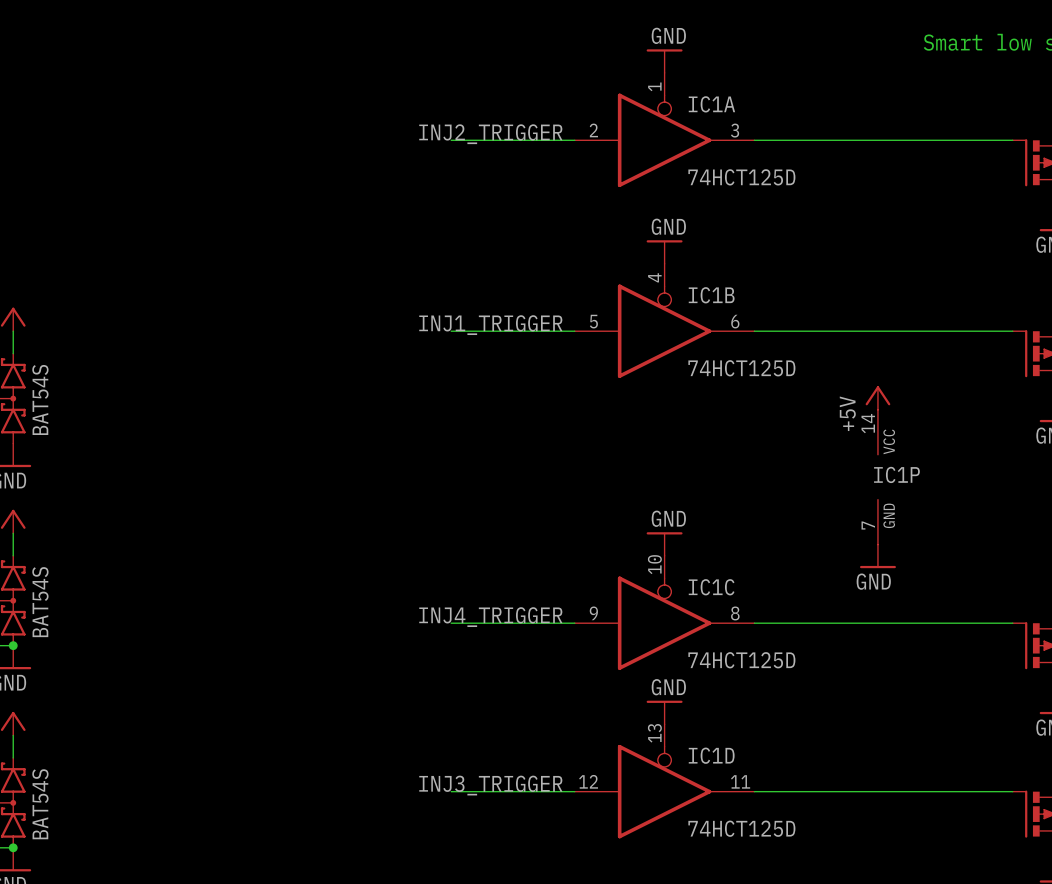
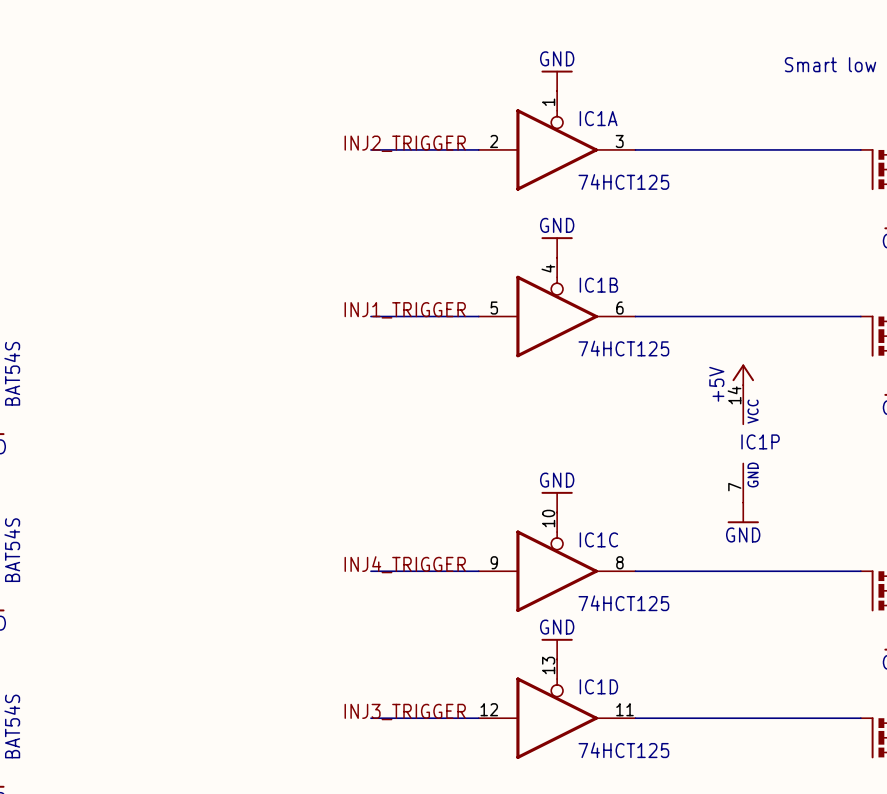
IC1A value: 74HCT125D (741, 177) -> 74HCT125 (623, 181)
IC1B value: 74HCT125D (741, 368) -> 74HCT125 (623, 348)
IC1C value: 74HCT125D (741, 660) -> 74HCT125 (623, 603)
IC1D value: 74HCT125D (741, 828) -> 74HCT125 (623, 750)

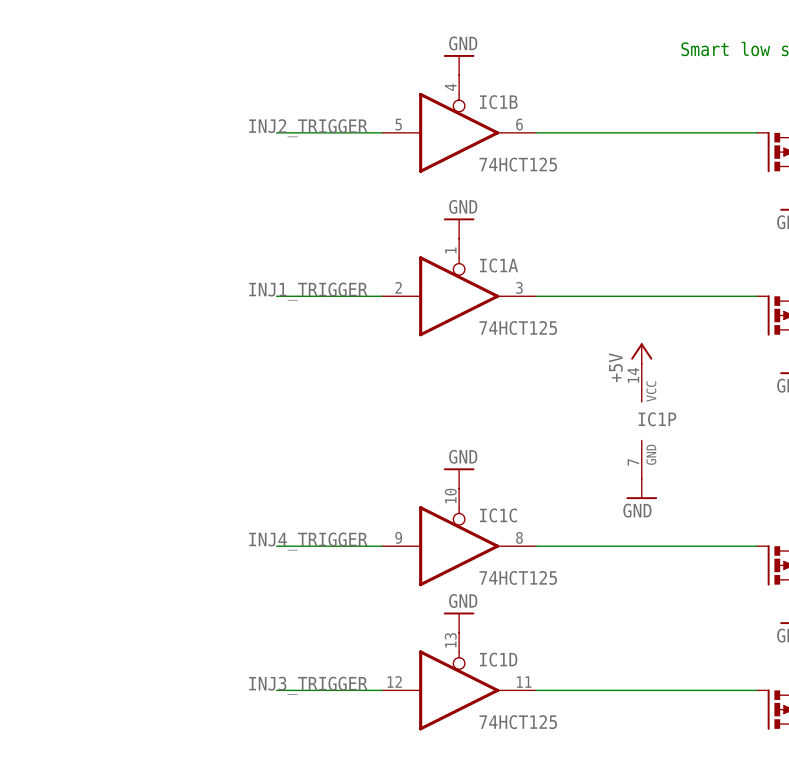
IC1A position: (557, 140) -> (459, 287)
IC1B position: (557, 307) -> (459, 124)

